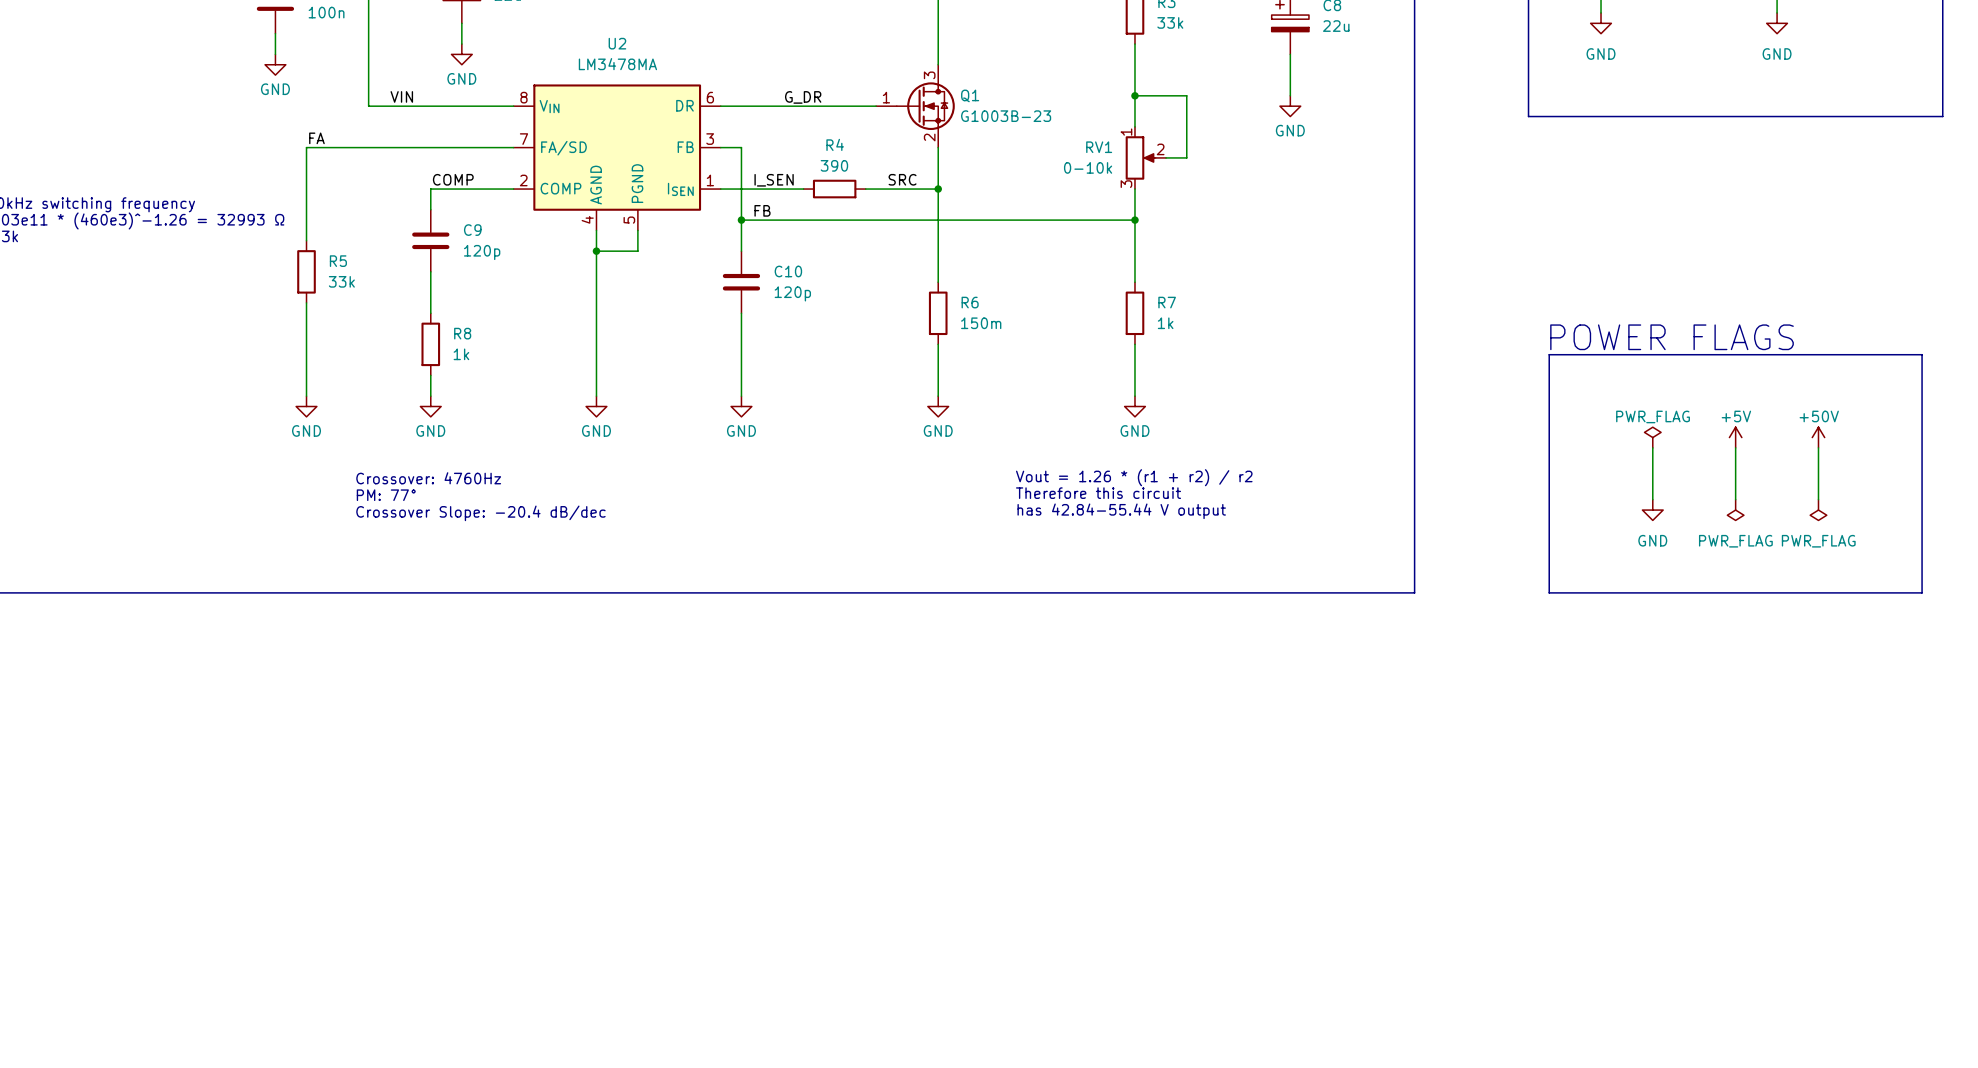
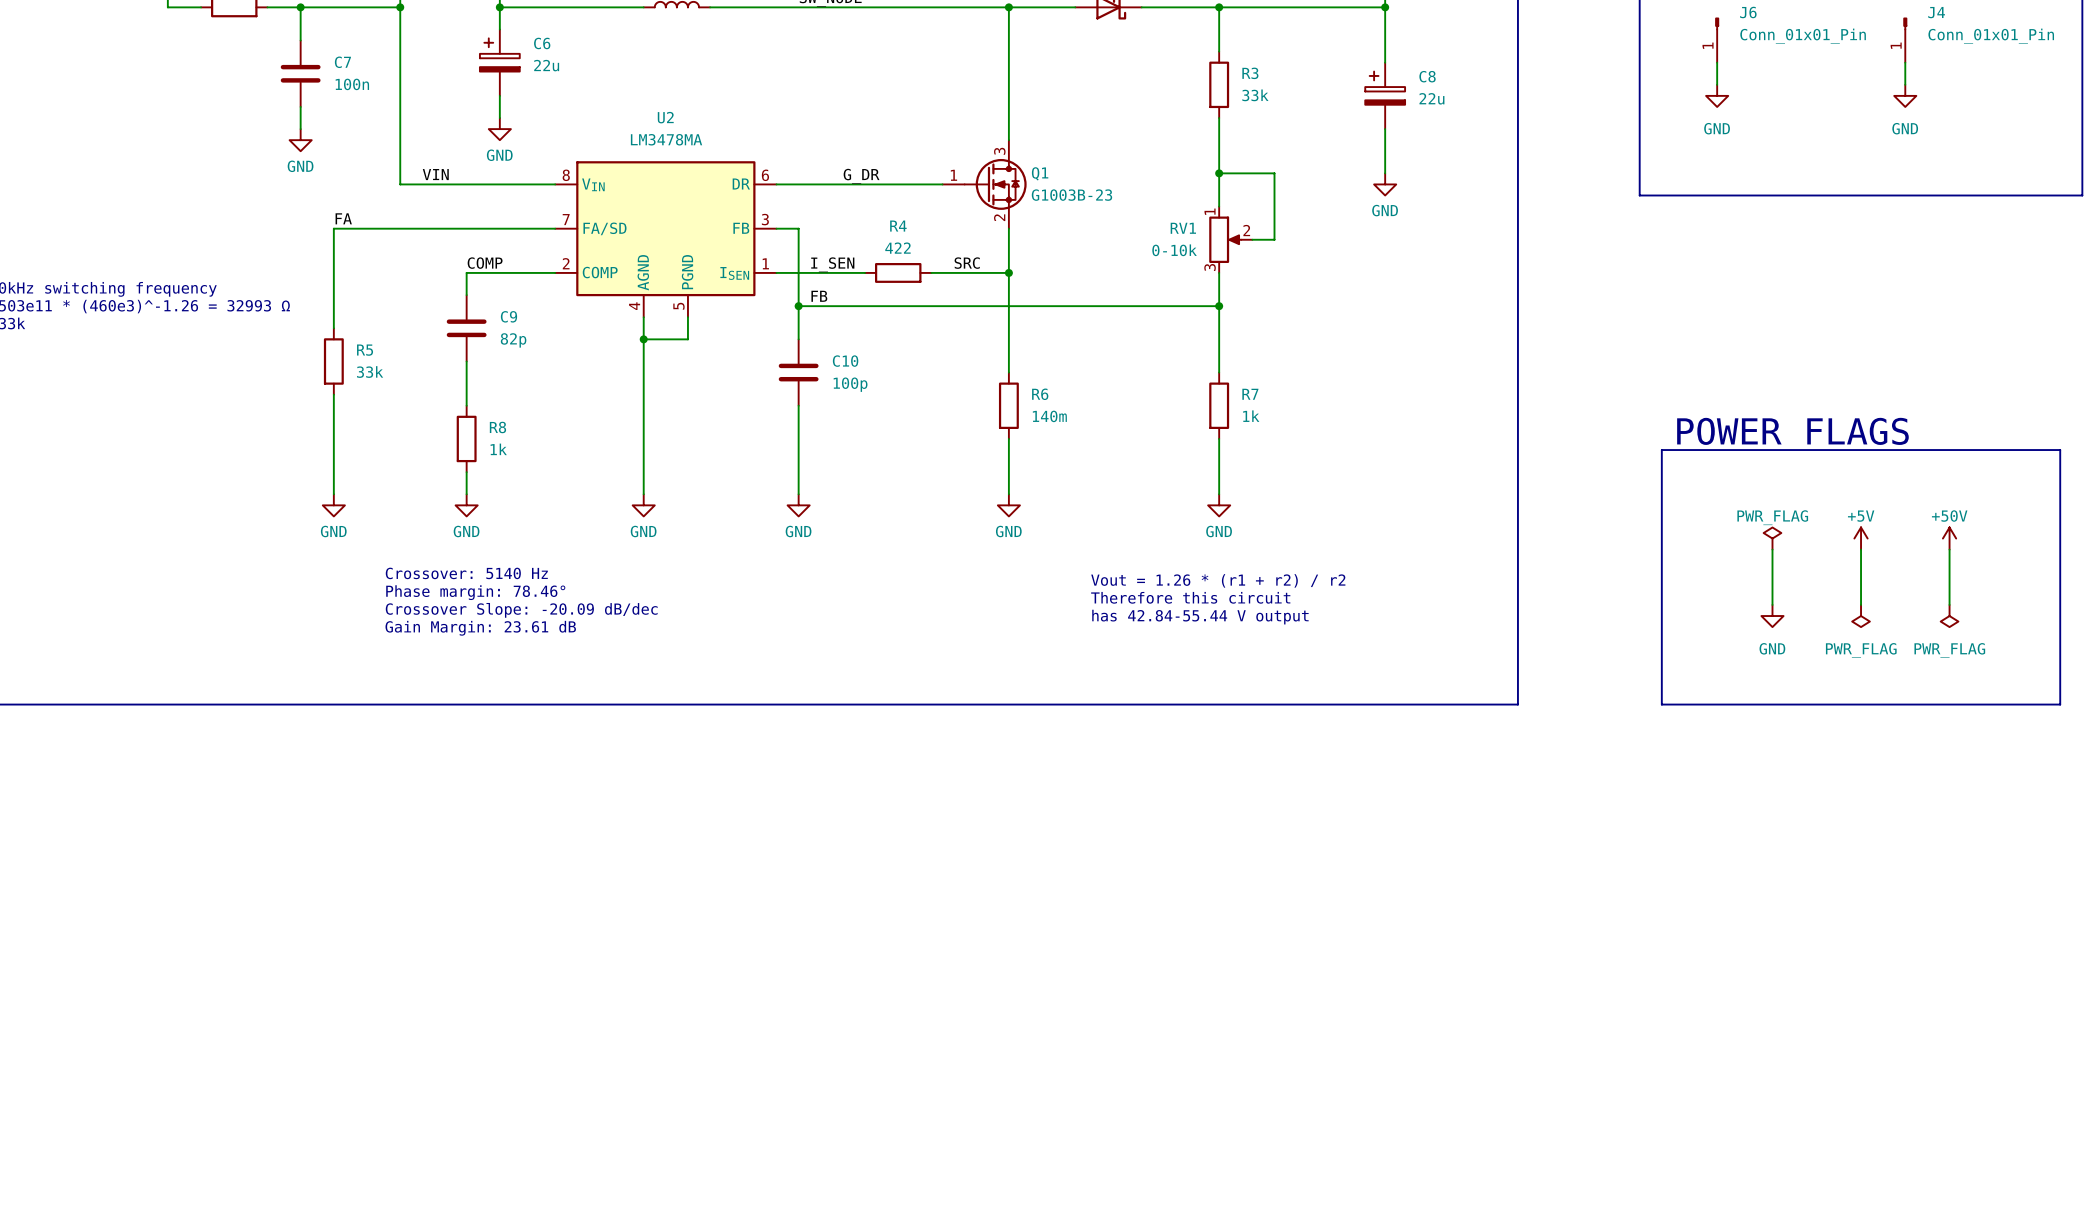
R4 value: 390 (834, 165) -> 422 (897, 248)
C9 value: 120p (482, 252) -> 82p (513, 340)
C10 value: 120p (792, 293) -> 100p (850, 384)
R6 value: 150m (981, 323) -> 140m (1049, 416)
text: Crossover: 4760Hz (428, 478) -> Crossover: 5140 Hz (466, 573)
text: none -> Phase margin: 78.46° (475, 592)
text: PM: 77° (386, 495) -> none
text: Crossover Slope: -20.4 dB/dec (480, 513) -> Crossover Slope: -20.09 dB/dec (521, 610)
text: none -> Gain Margin: 23.61 dB (480, 628)

